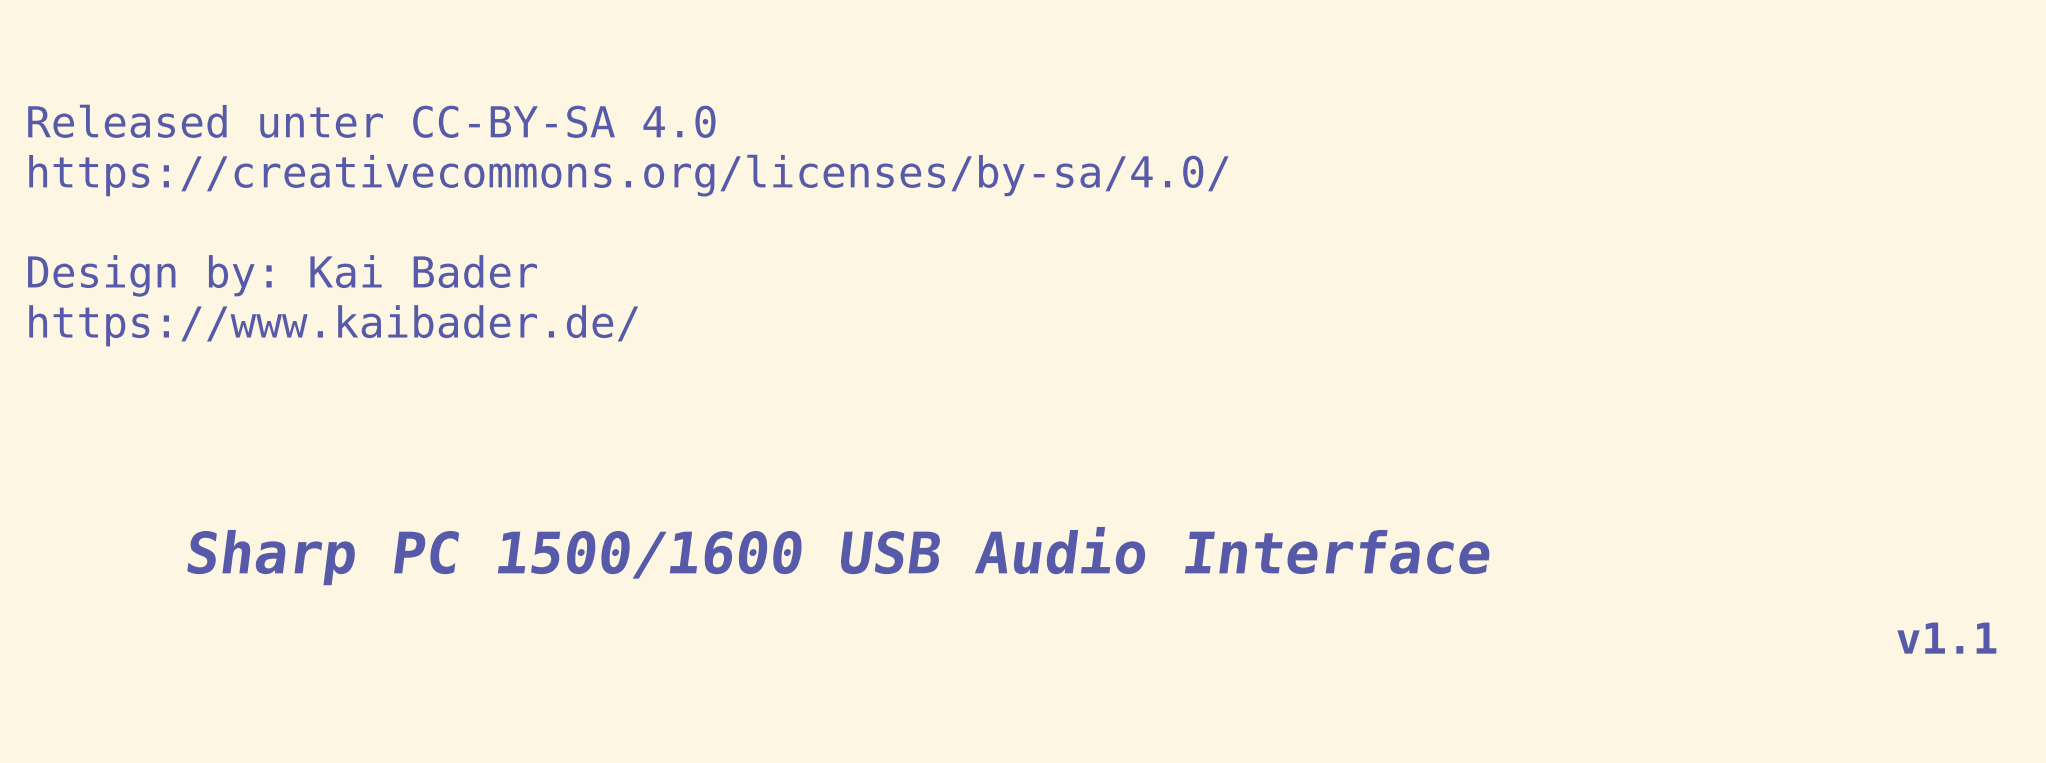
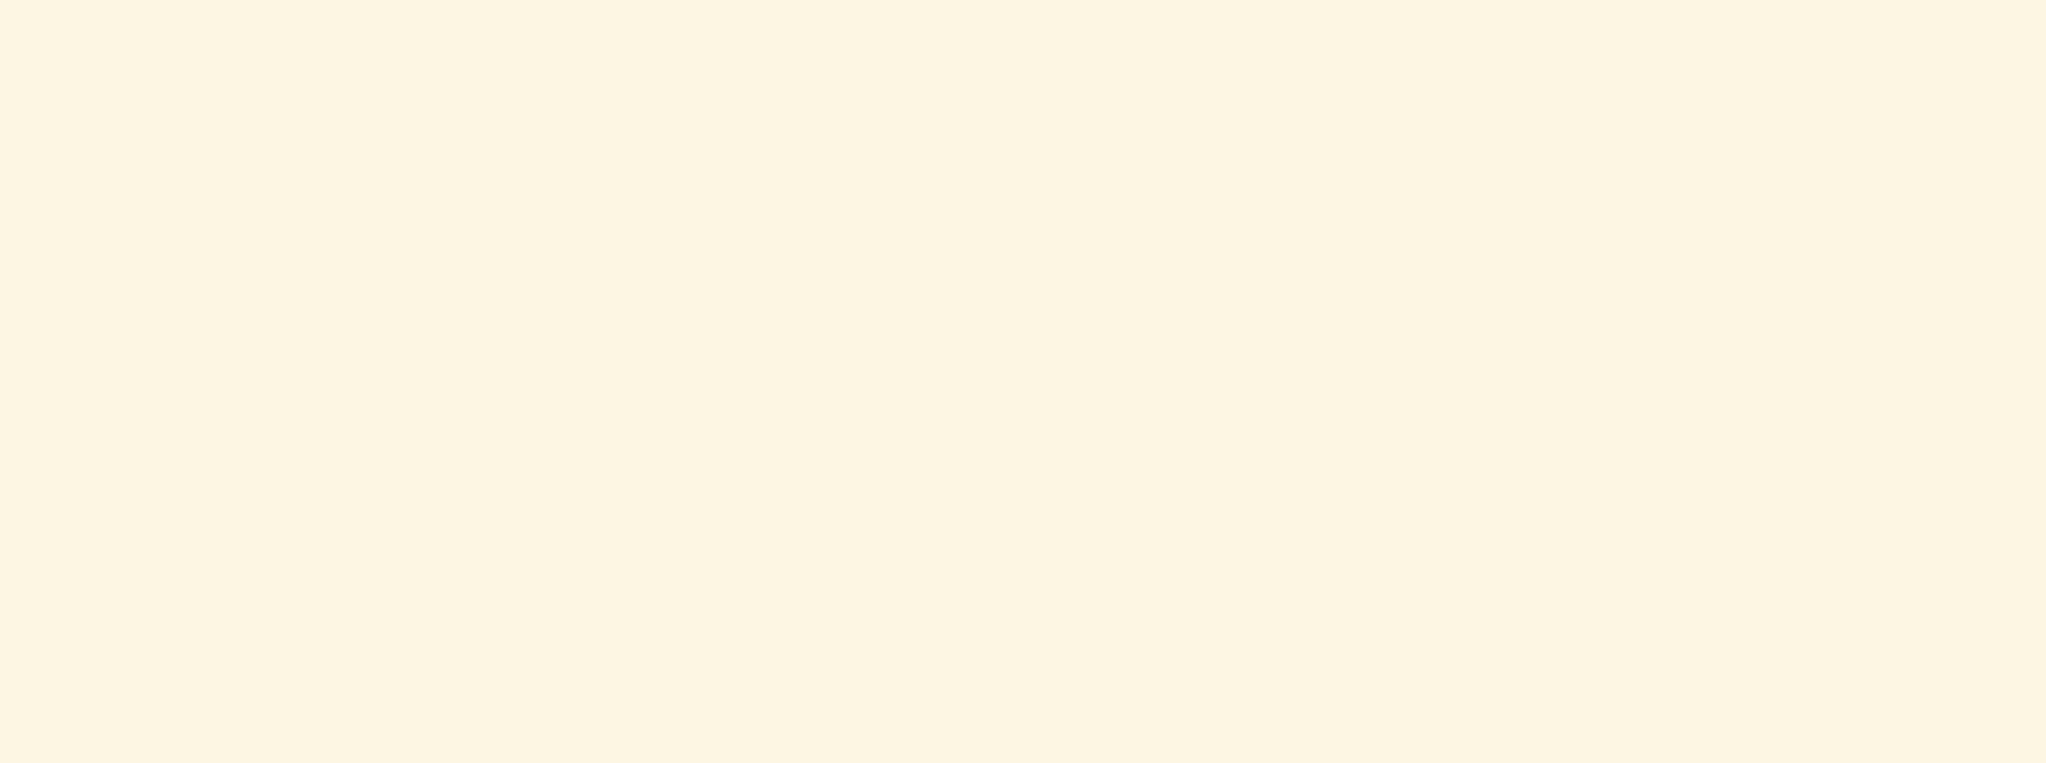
text: Released unter CC-BY-SA 4.0 (371, 121) -> none
text: https://creativecommons.org/licenses/by-sa/4.0/ (628, 175) -> none
text: Design by: Kai Bader (282, 275) -> none
text: https://www.kaibader.de/ (333, 325) -> none
text: Sharp PC 1500/1600 USB Audio Interface (838, 556) -> none
text: v1.1 (1946, 638) -> none

